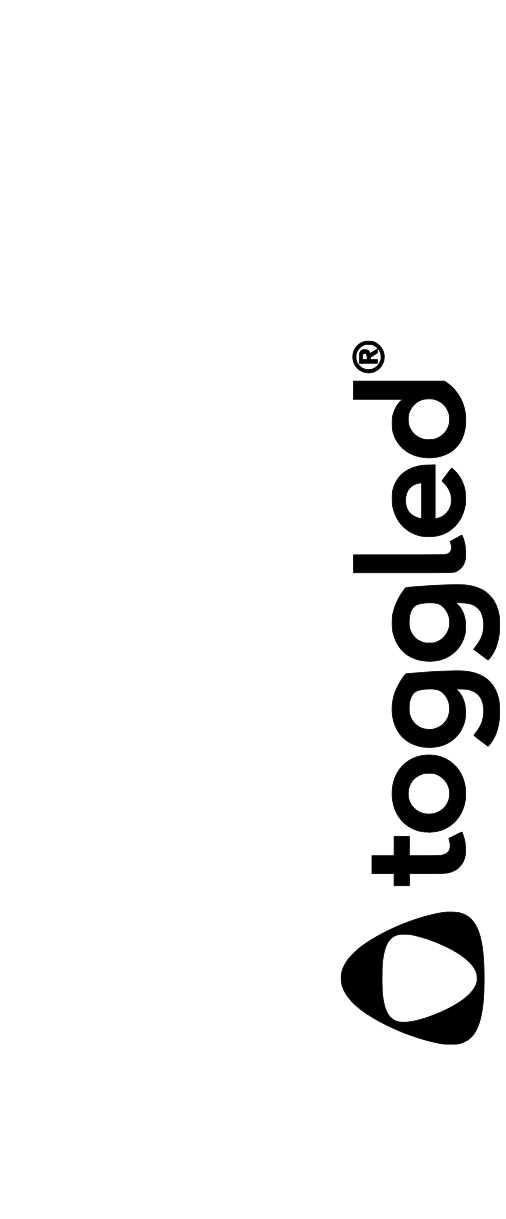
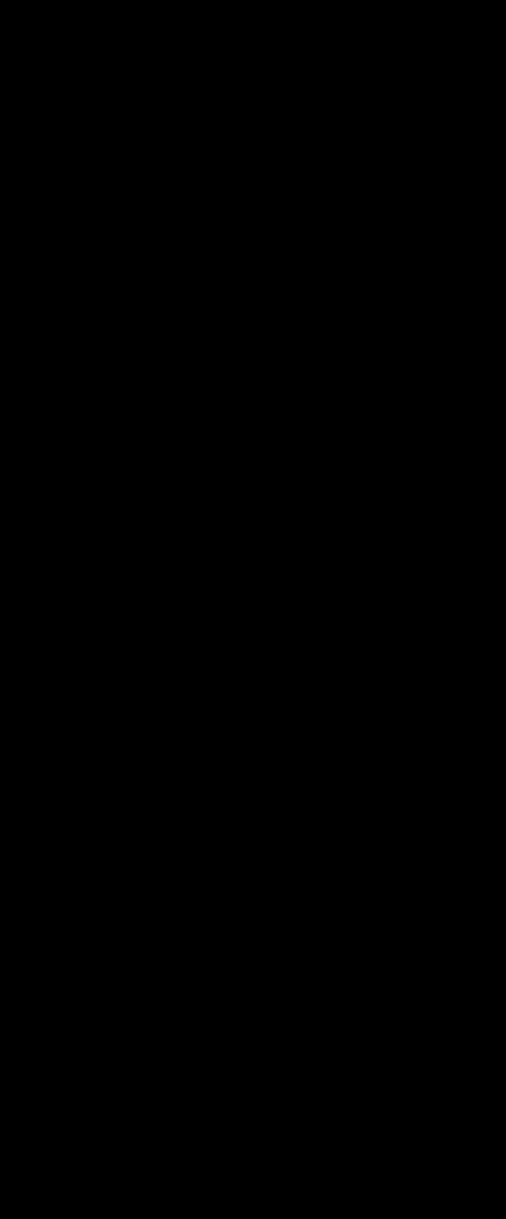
drawing: [340, 340, 501, 1045] -> none

